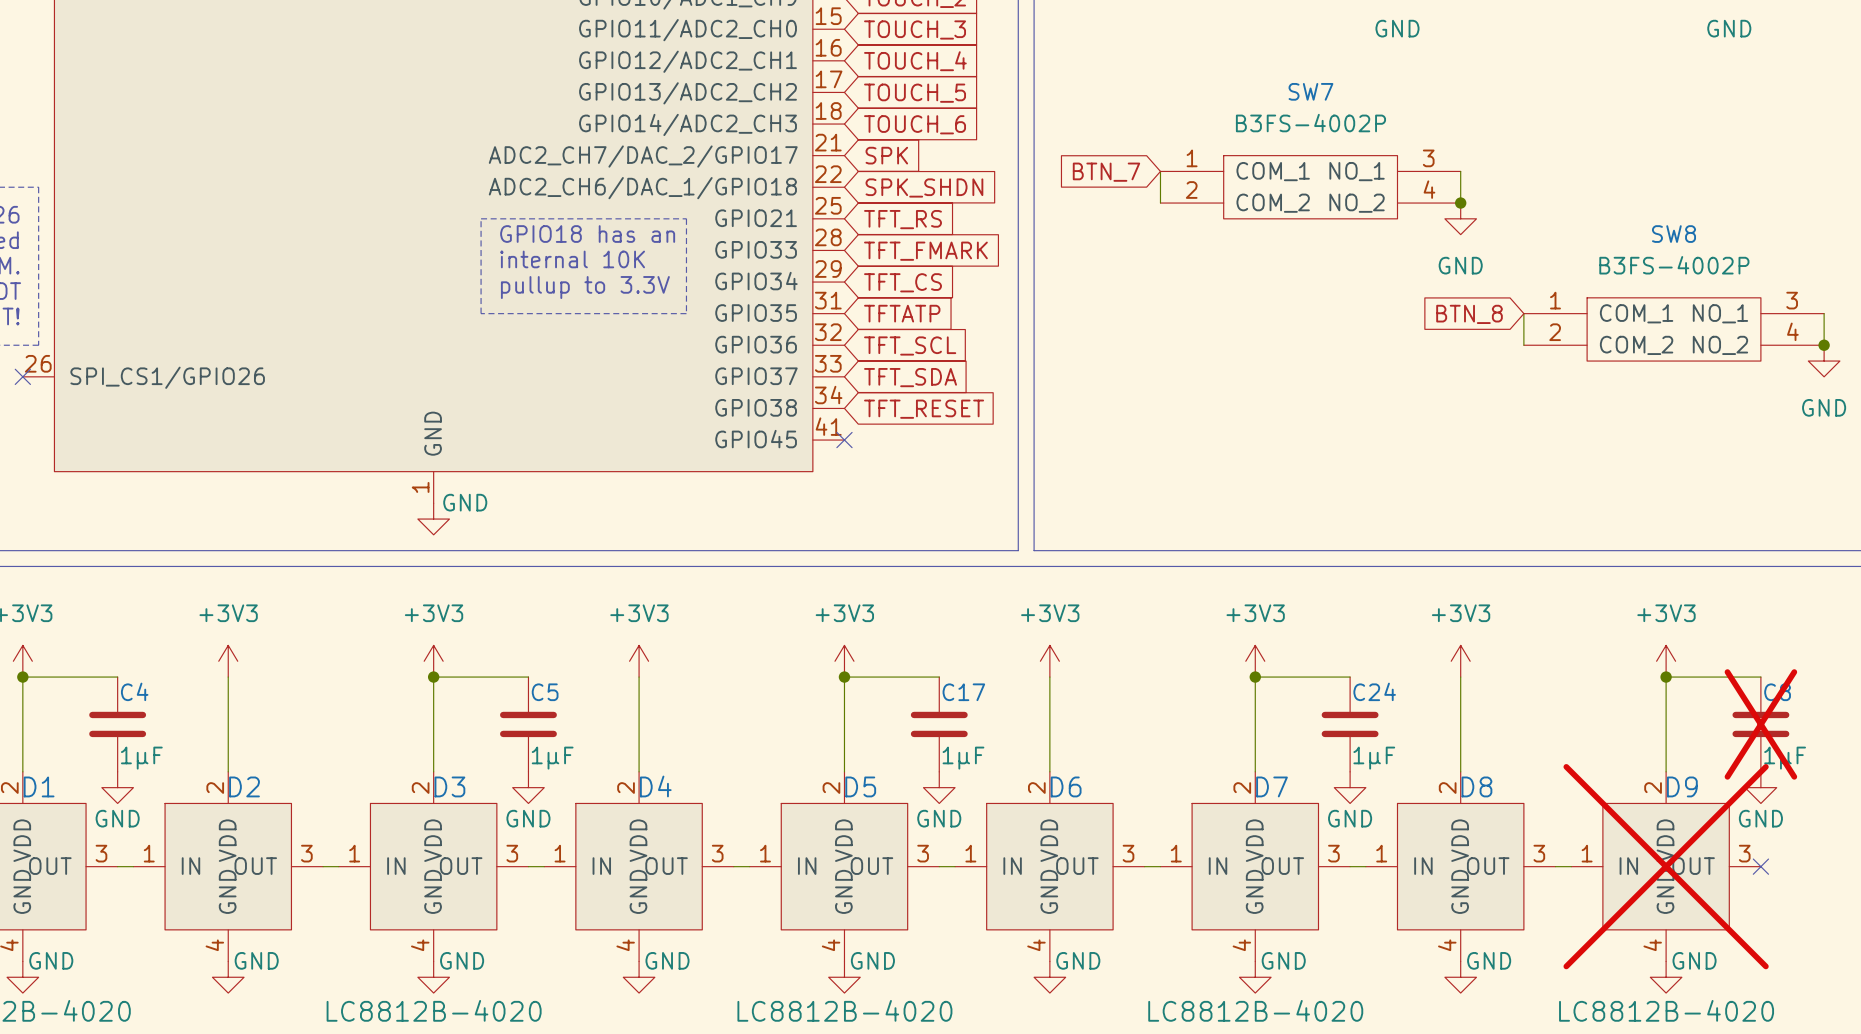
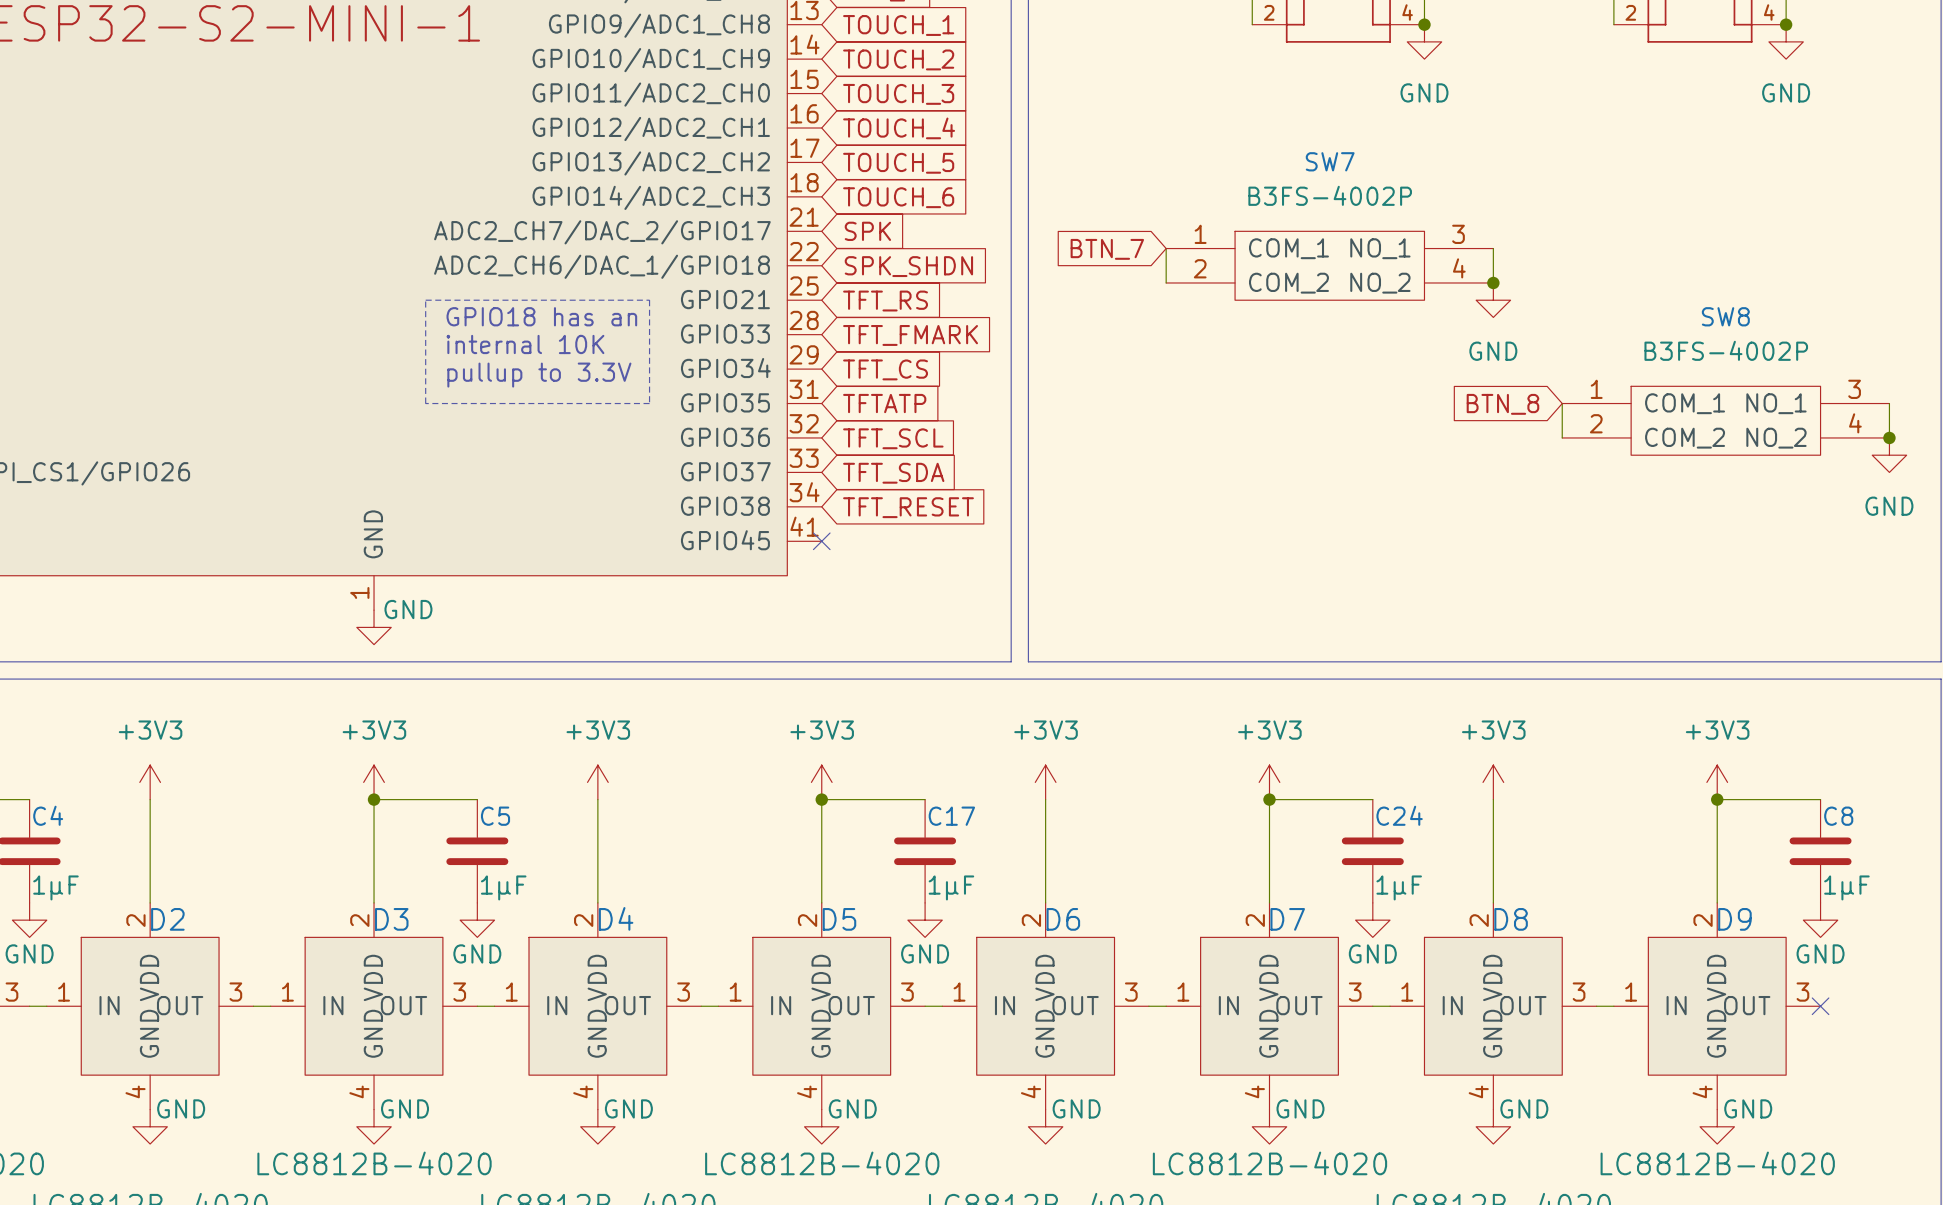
C8 do-not-place cross: (1760, 724) -> none
D9 do-not-place cross: (1666, 866) -> none

